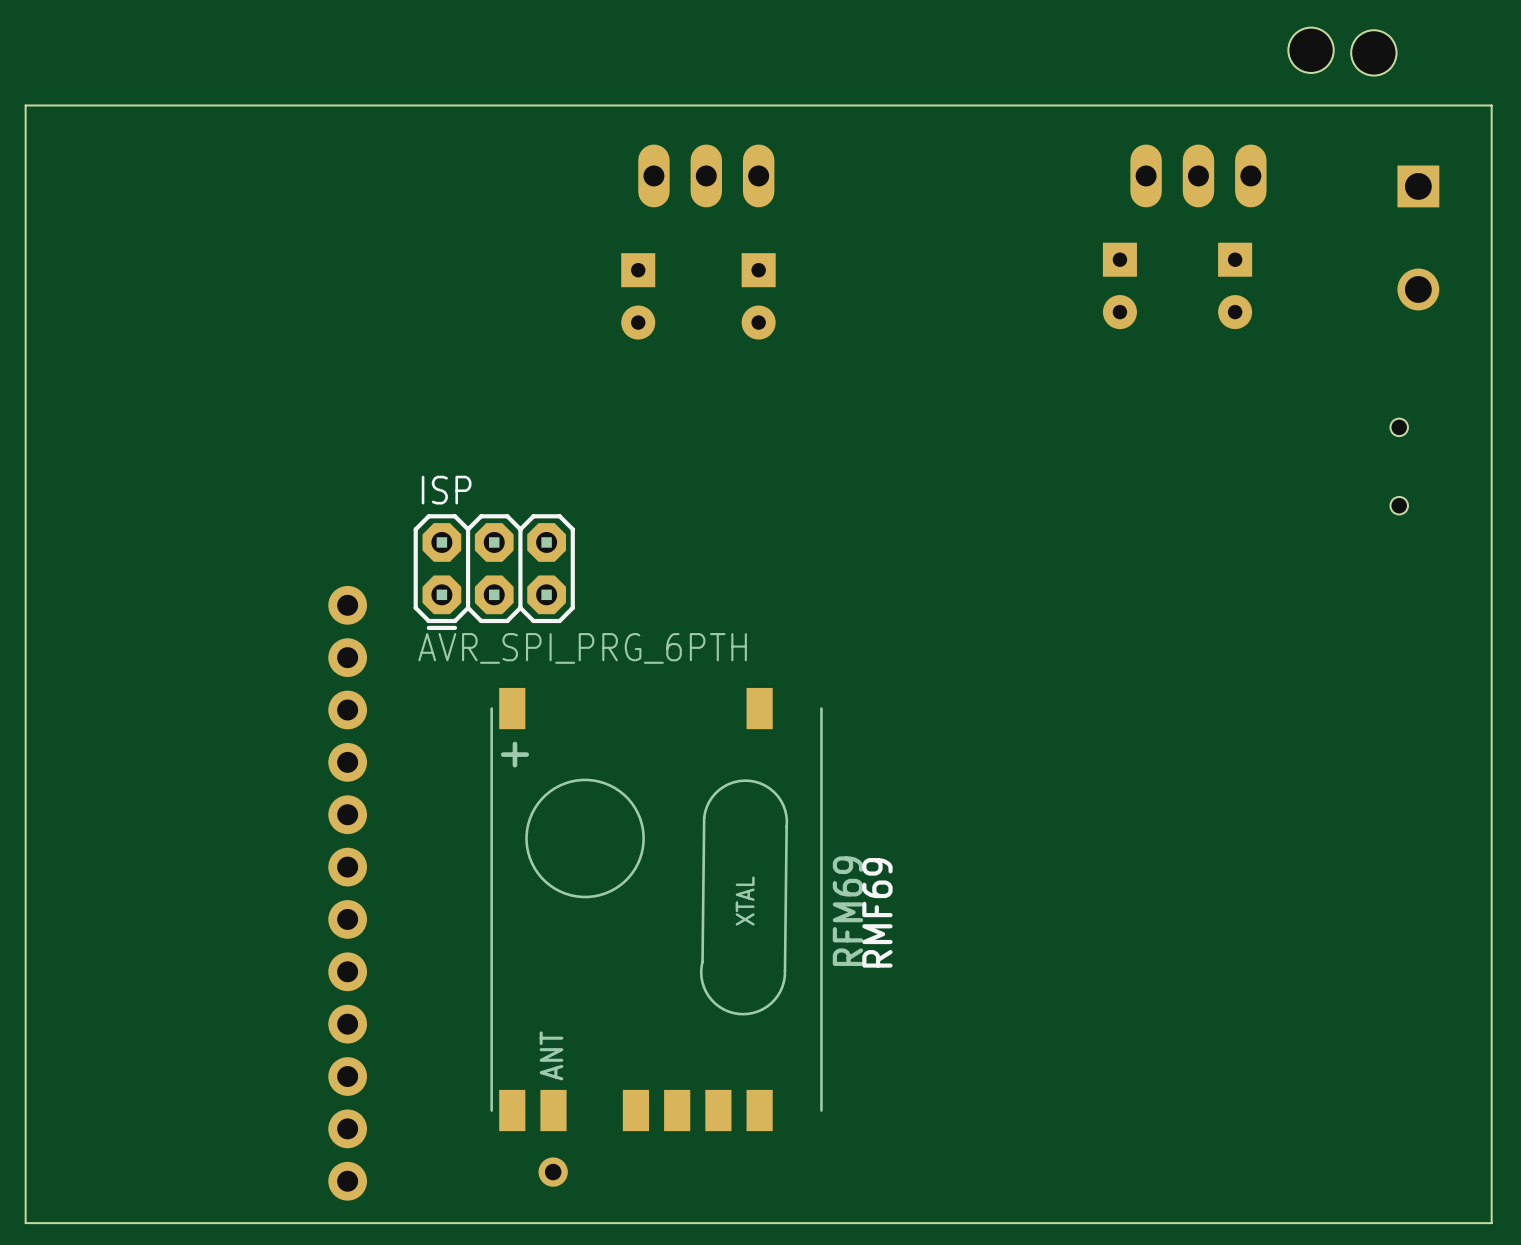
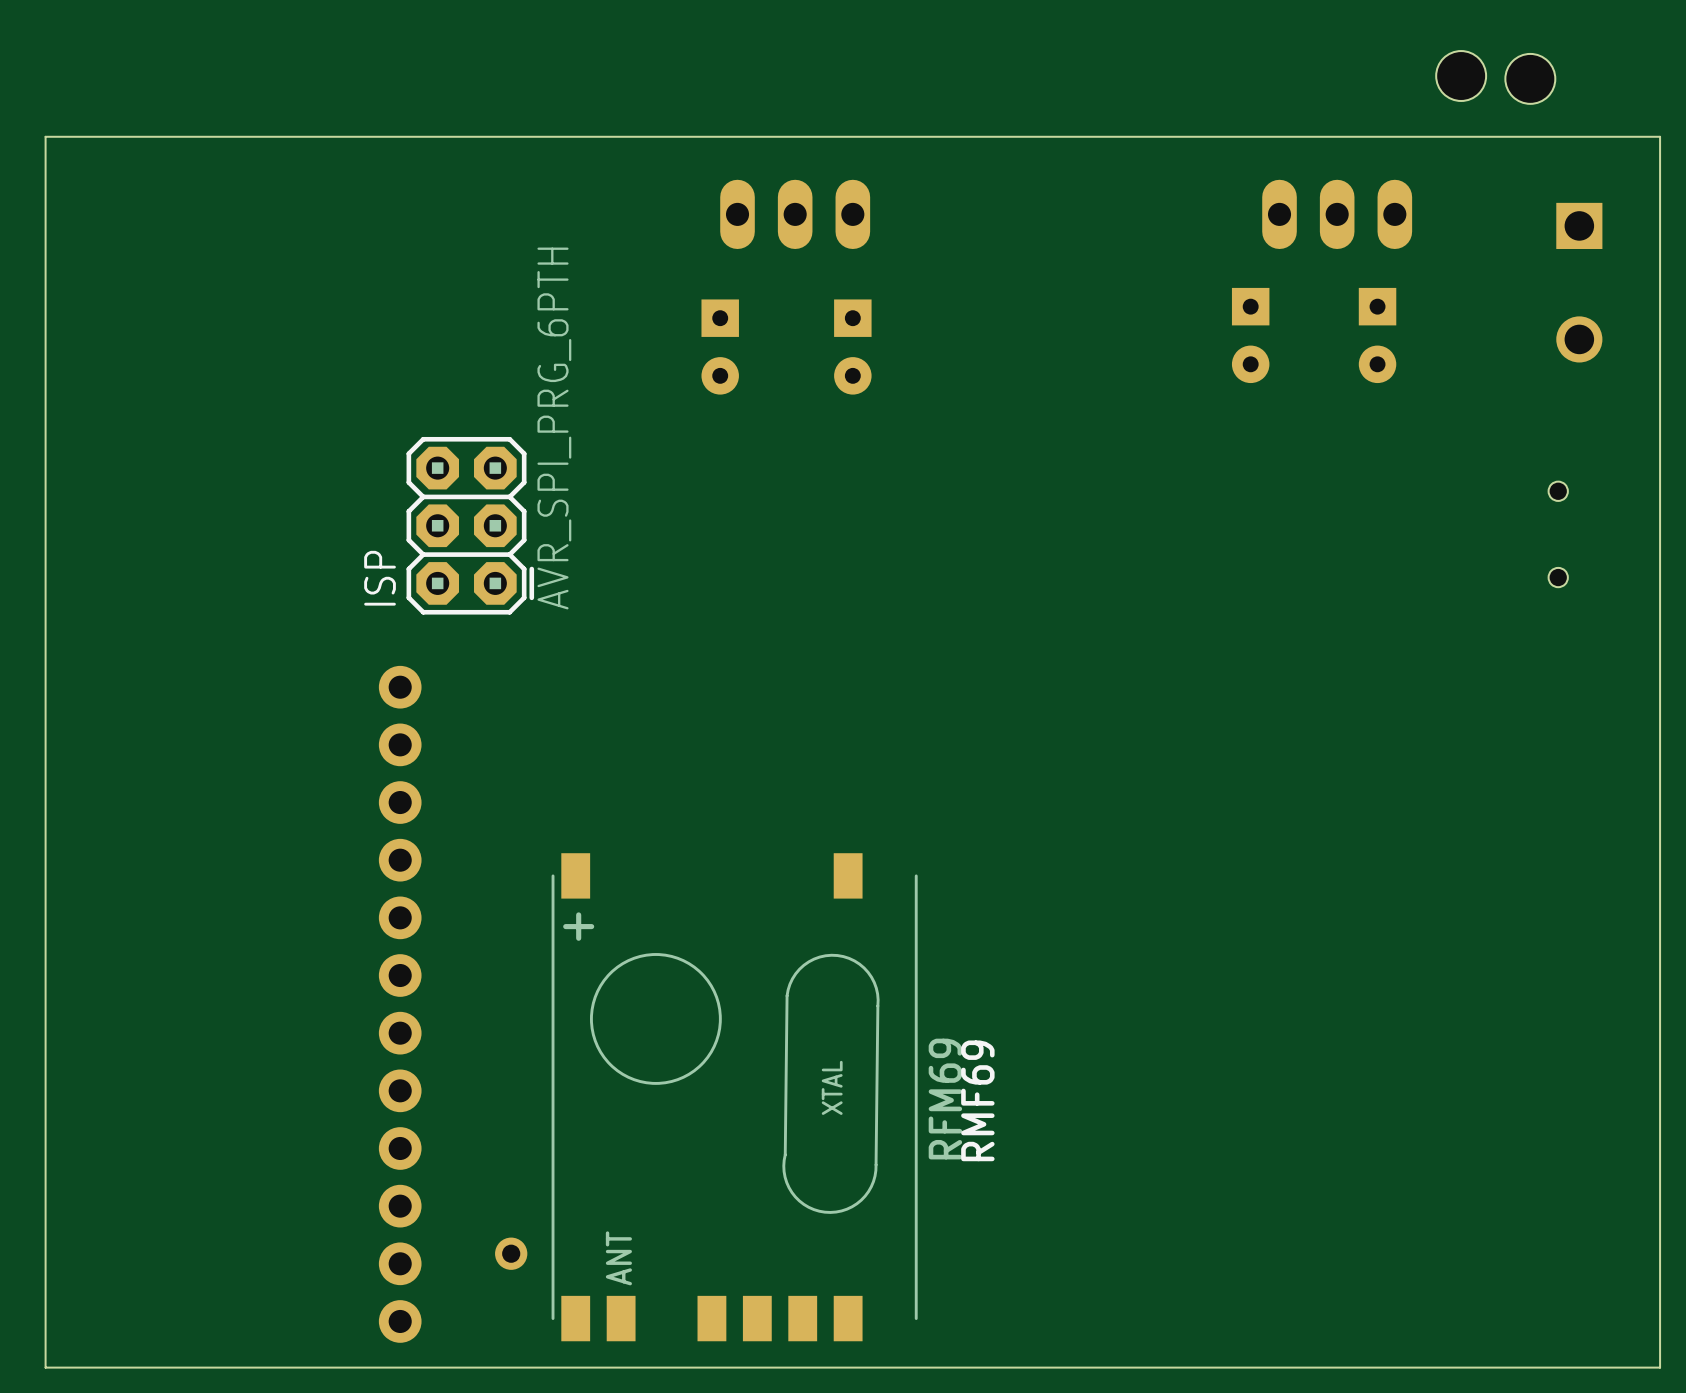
ISP rotation: 0° (494, 572) -> 90° counterclockwise (470, 525)
ISP position: (494, 572) -> (470, 525)
RMF69 position: (656, 909) -> (734, 1097)
part position: (553, 1172) -> (511, 1253)

